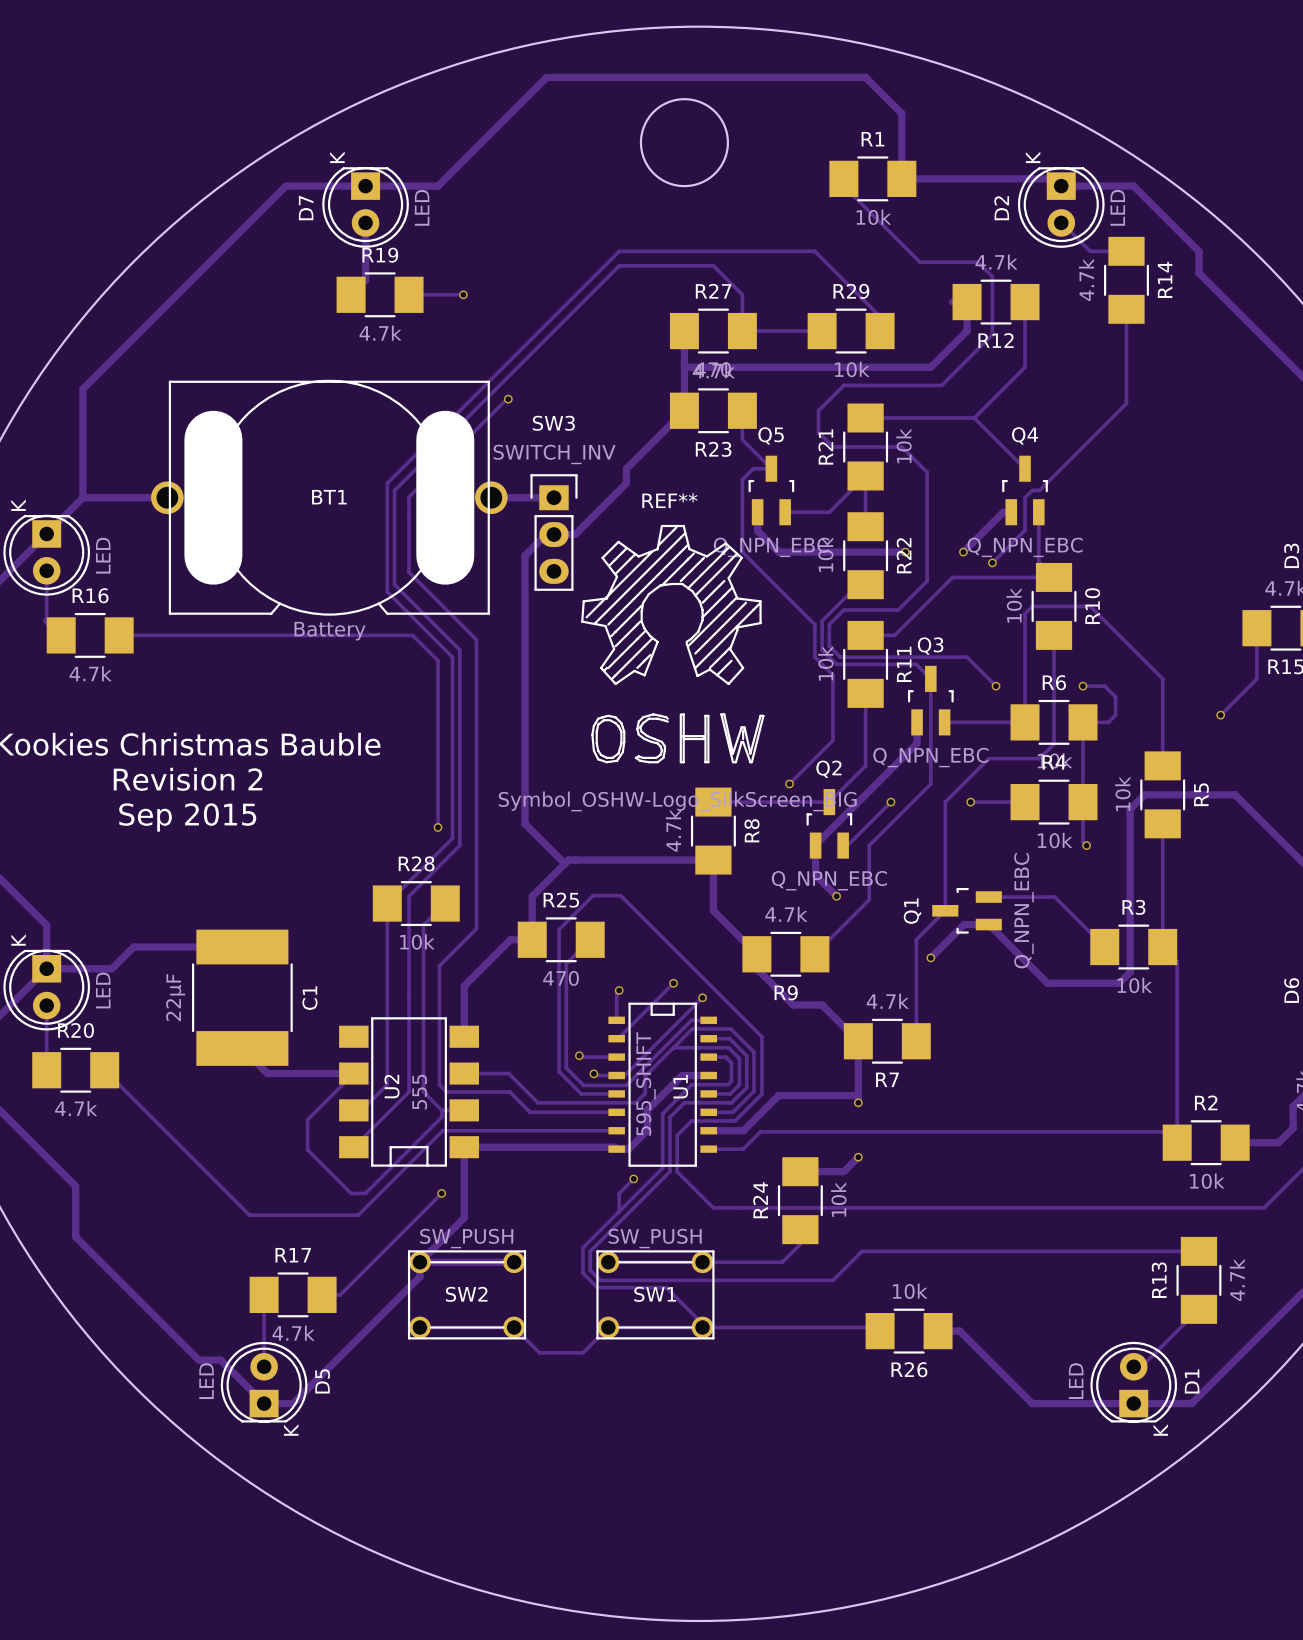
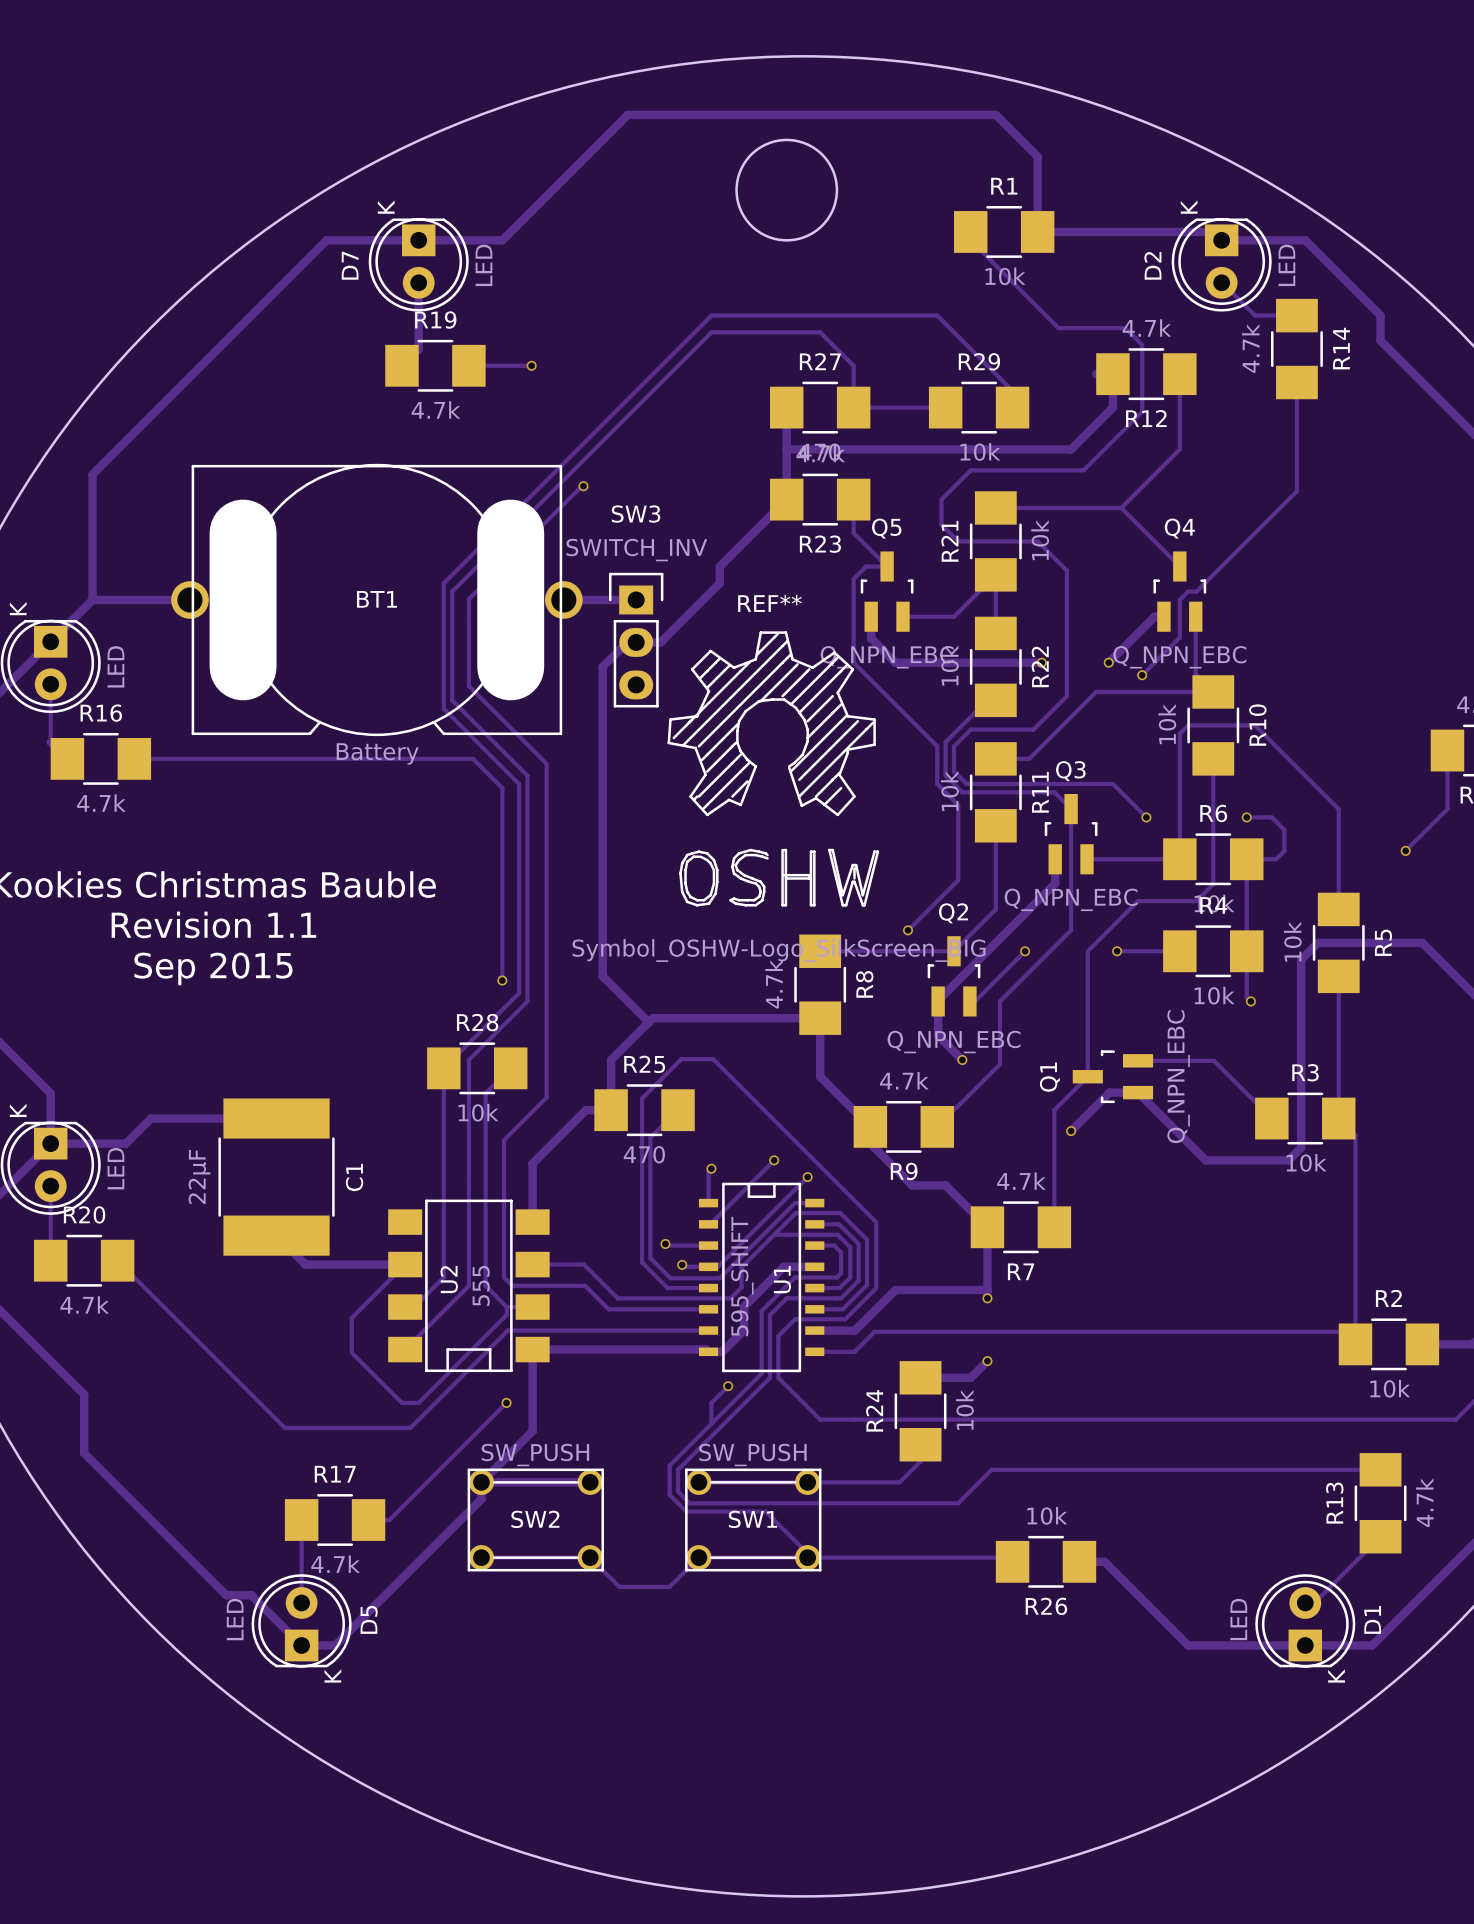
text: Revision 2 (188, 779) -> Revision 1.1 (213, 924)

